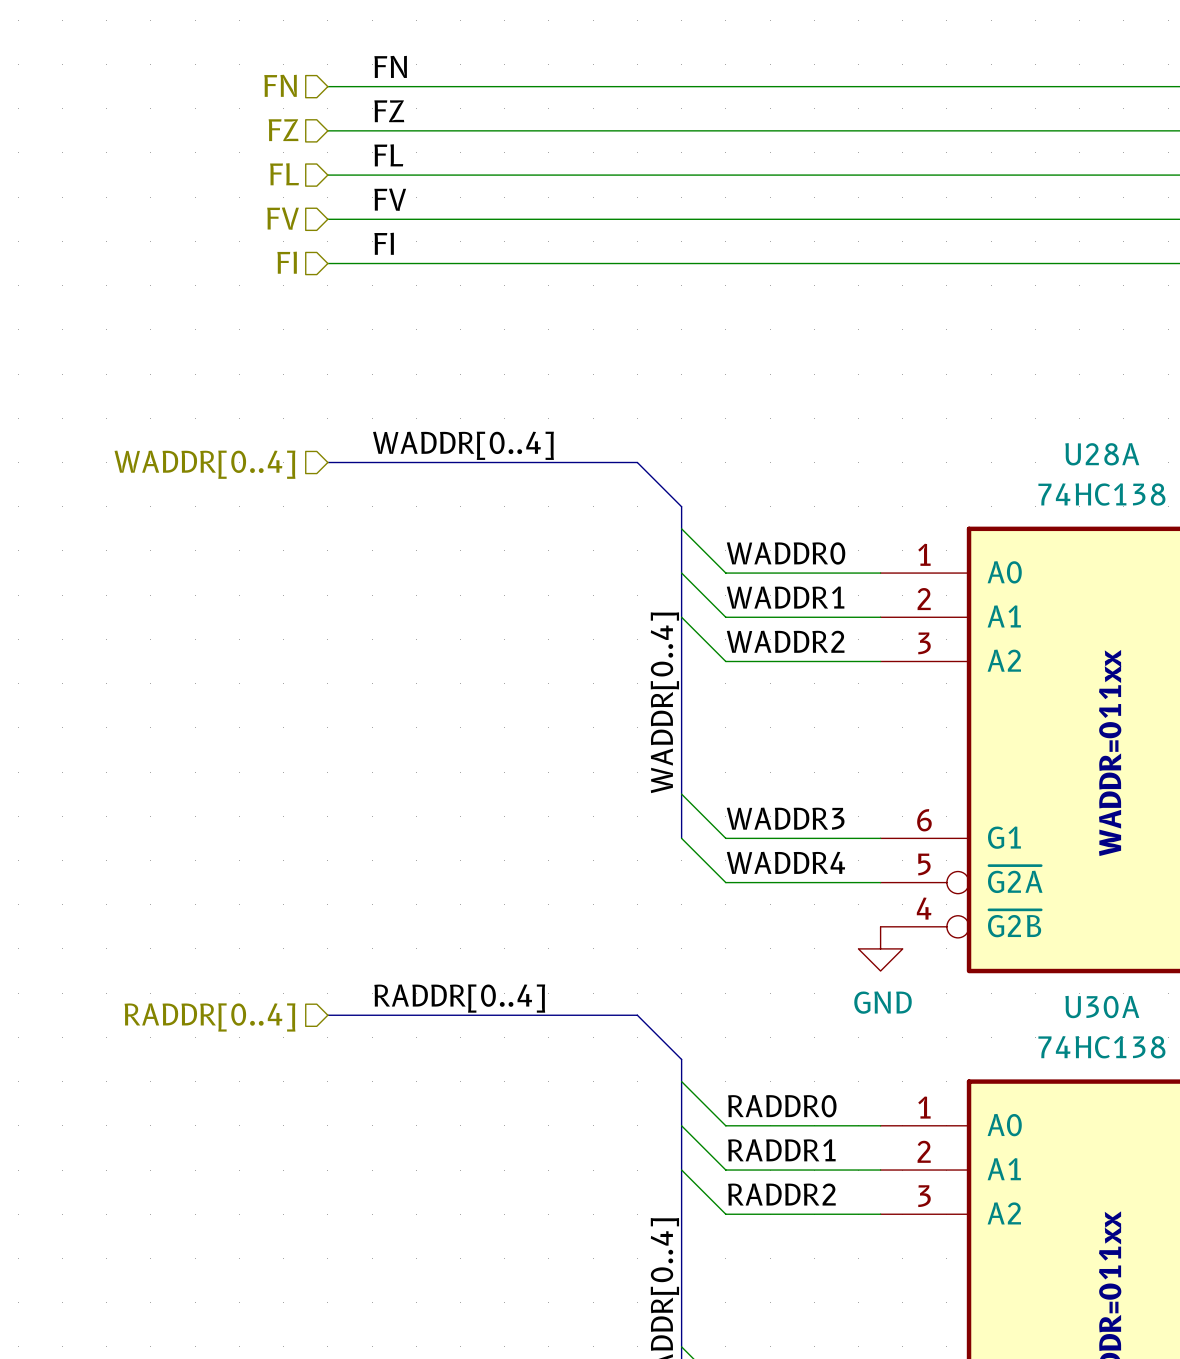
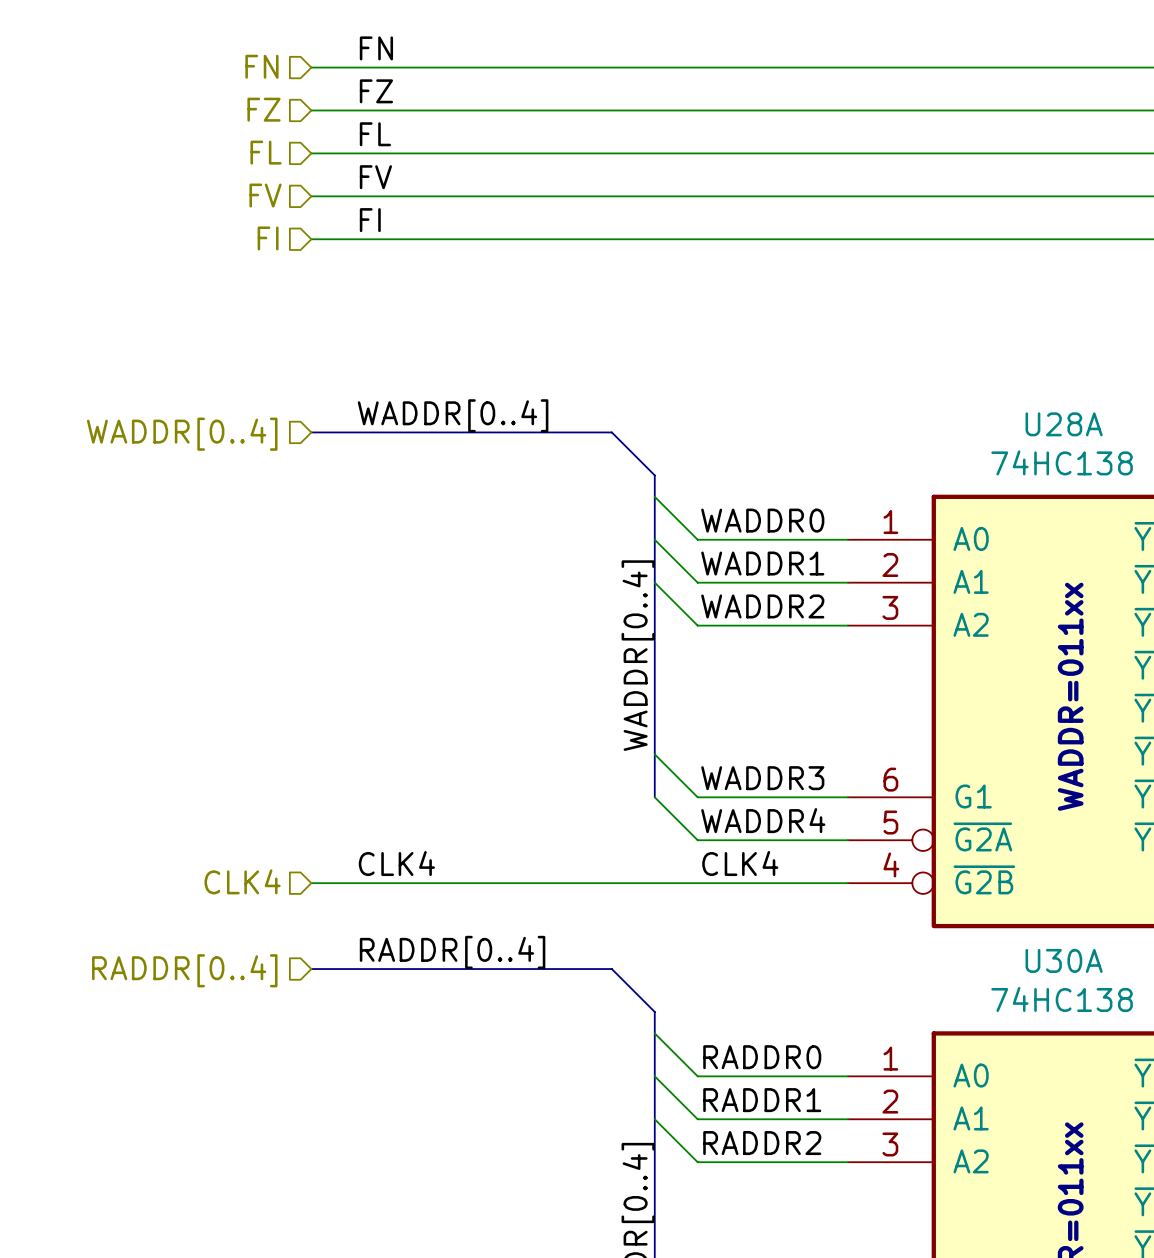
label: none -> CLK4 (396, 863)
label: none -> CLK4 (740, 863)
hierarchical label: none -> CLK4 (242, 881)
wire: none -> (311, 883) (847, 883)
power symbol: GND (880, 948) -> none

